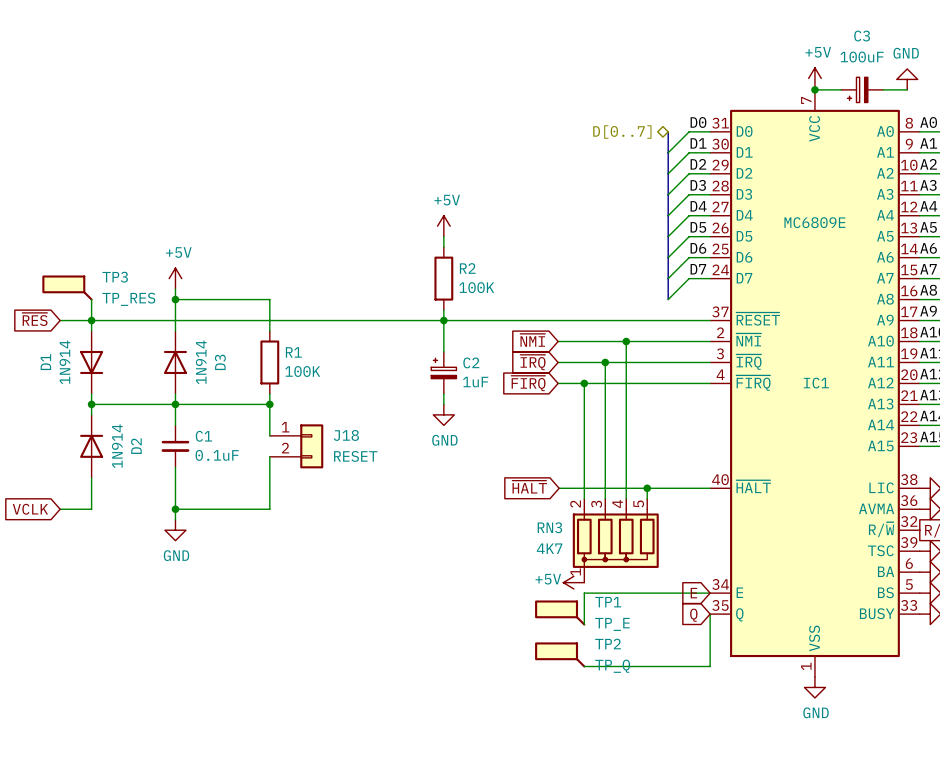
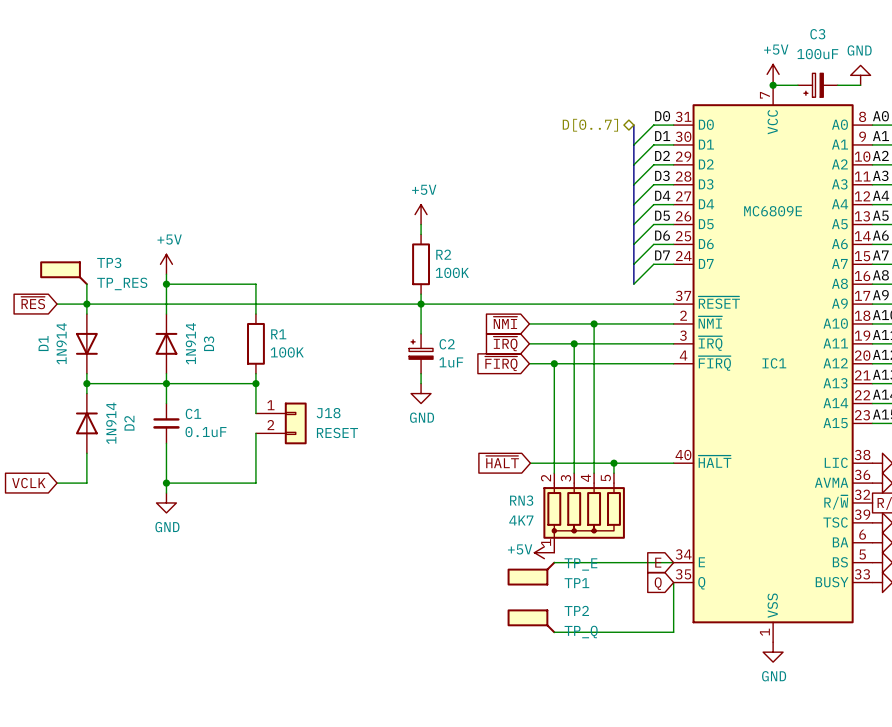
wire: (584, 593) (584, 624) -> none
TP1 flip: as is (560, 613) -> up-down (531, 573)

